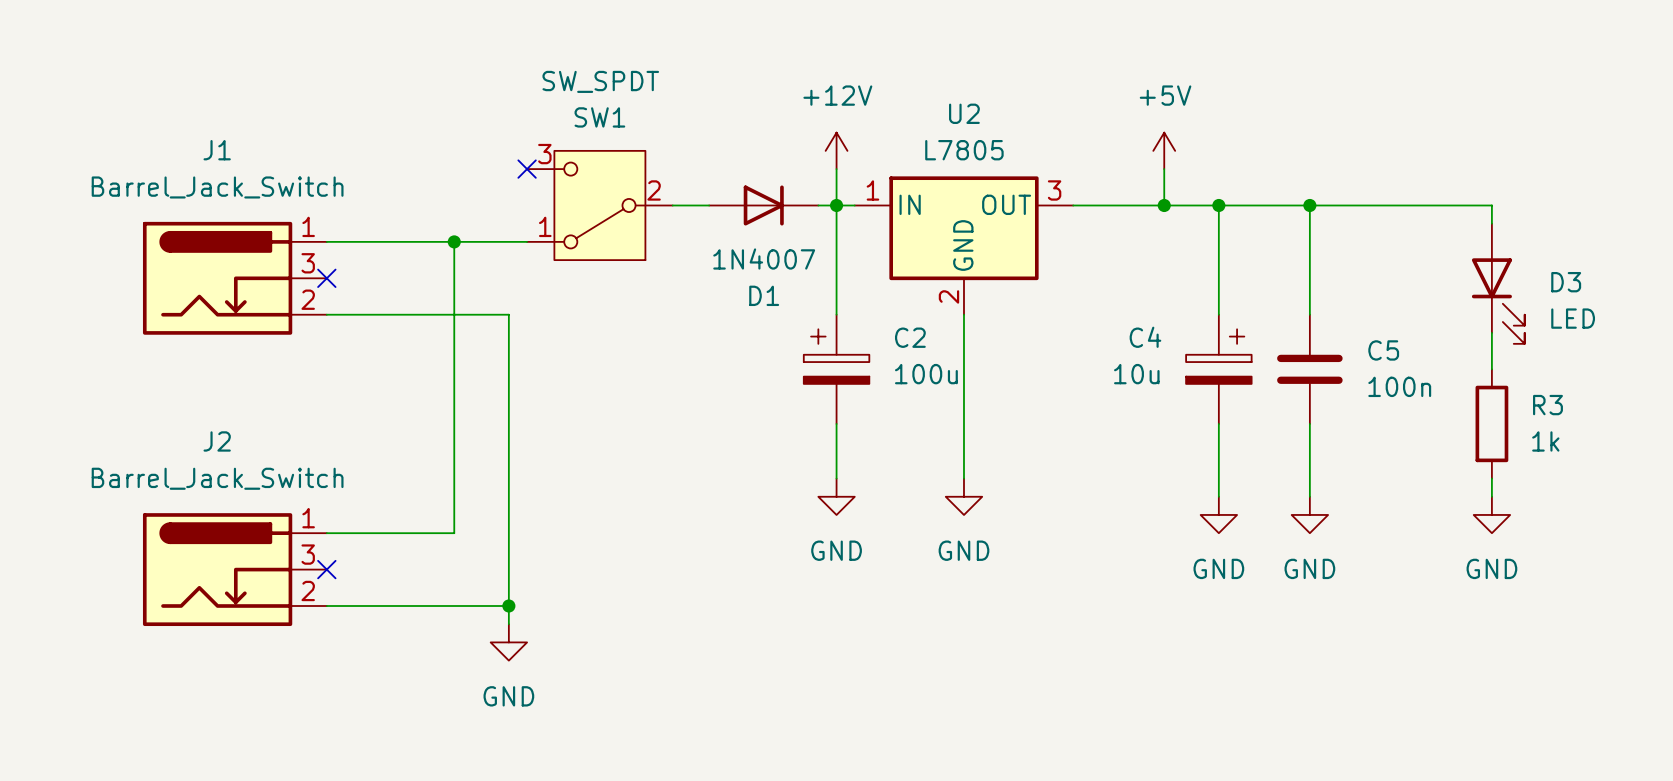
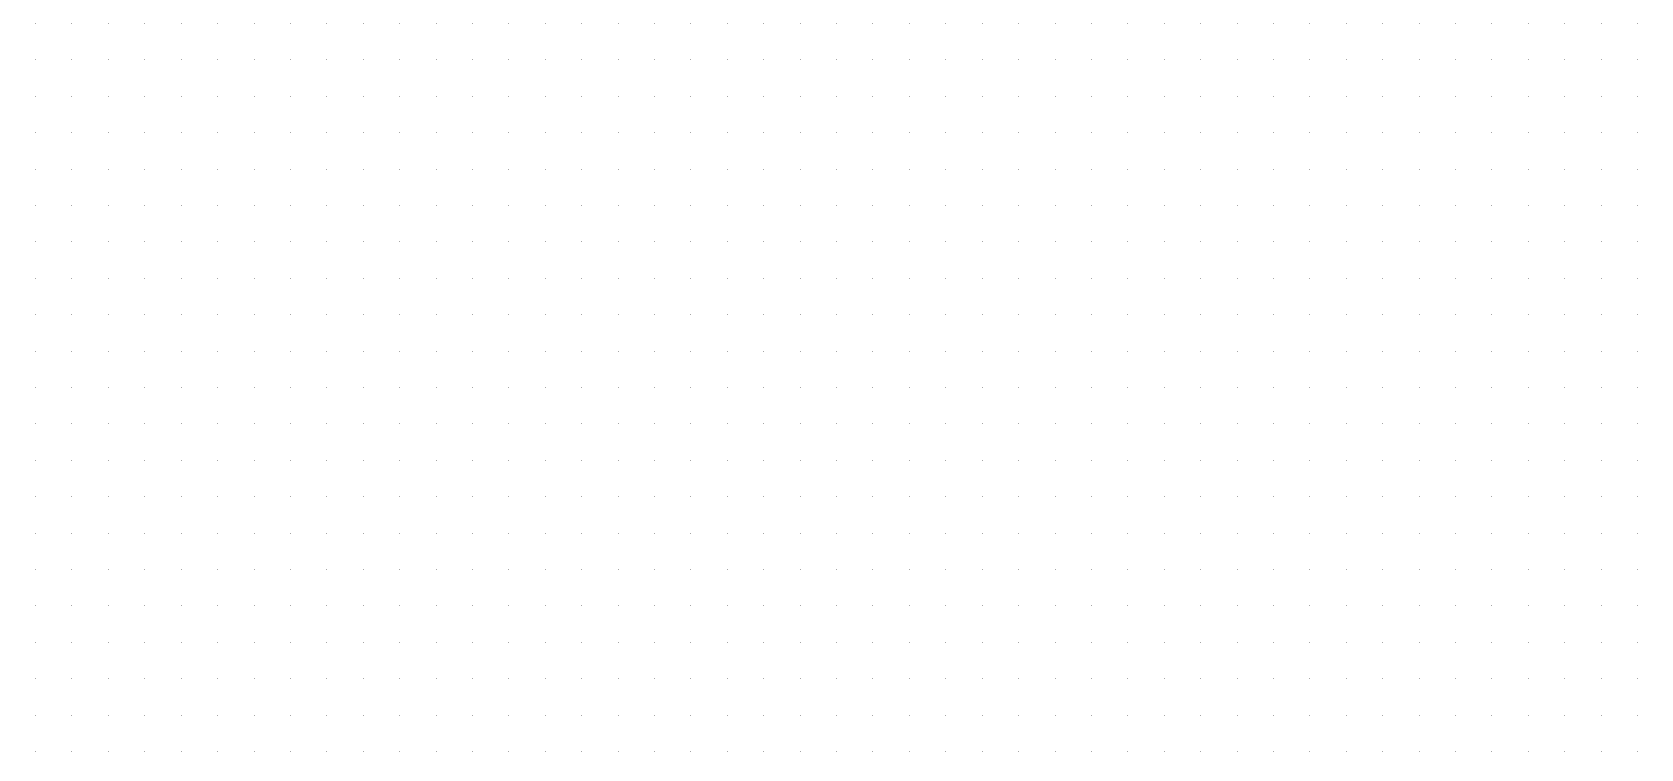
power symbol: +12V (836, 150) -> none
power symbol: +5V (1164, 150) -> none
no-connect mark: (527, 169) -> none
wire: (836, 169) (836, 314) -> none
wire: (1164, 169) (1164, 205) -> none
SW1: SW_SPDT (599, 205) -> none
wire: (672, 205) (709, 205) -> none
D1: 1N4007 (763, 205) -> none
wire: (818, 205) (854, 205) -> none
junction: (836, 205) -> none
wire: (1073, 205) (1491, 205) (1491, 223) -> none
junction: (1164, 205) -> none
wire: (1218, 205) (1218, 314) -> none
junction: (1218, 205) -> none
wire: (1309, 205) (1309, 314) -> none
junction: (1309, 205) -> none
wire: (326, 241) (527, 241) -> none
wire: (454, 241) (454, 533) (326, 533) -> none
junction: (454, 241) -> none
U2: L7805 (963, 245) -> none
J1: Barrel_Jack_Switch (234, 278) -> none
no-connect mark: (326, 278) -> none
D3: LED (1498, 283) -> none
wire: (326, 314) (508, 314) (508, 624) -> none
wire: (963, 314) (963, 478) -> none
wire: (1491, 332) (1491, 369) -> none
C2: 100u (836, 369) -> none
C4: 10u (1218, 369) -> none
C5: 100n (1309, 369) -> none
wire: (836, 423) (836, 478) -> none
wire: (1218, 423) (1218, 496) -> none
wire: (1309, 423) (1309, 496) -> none
R3: 1k (1491, 423) -> none
wire: (1491, 478) (1491, 496) -> none
power symbol: GND (836, 496) -> none
power symbol: GND (963, 496) -> none
power symbol: GND (1218, 514) -> none
power symbol: GND (1309, 514) -> none
power symbol: GND (1491, 514) -> none
J2: Barrel_Jack_Switch (234, 569) -> none
no-connect mark: (326, 569) -> none
wire: (326, 605) (508, 605) -> none
junction: (508, 605) -> none
power symbol: GND (508, 642) -> none

